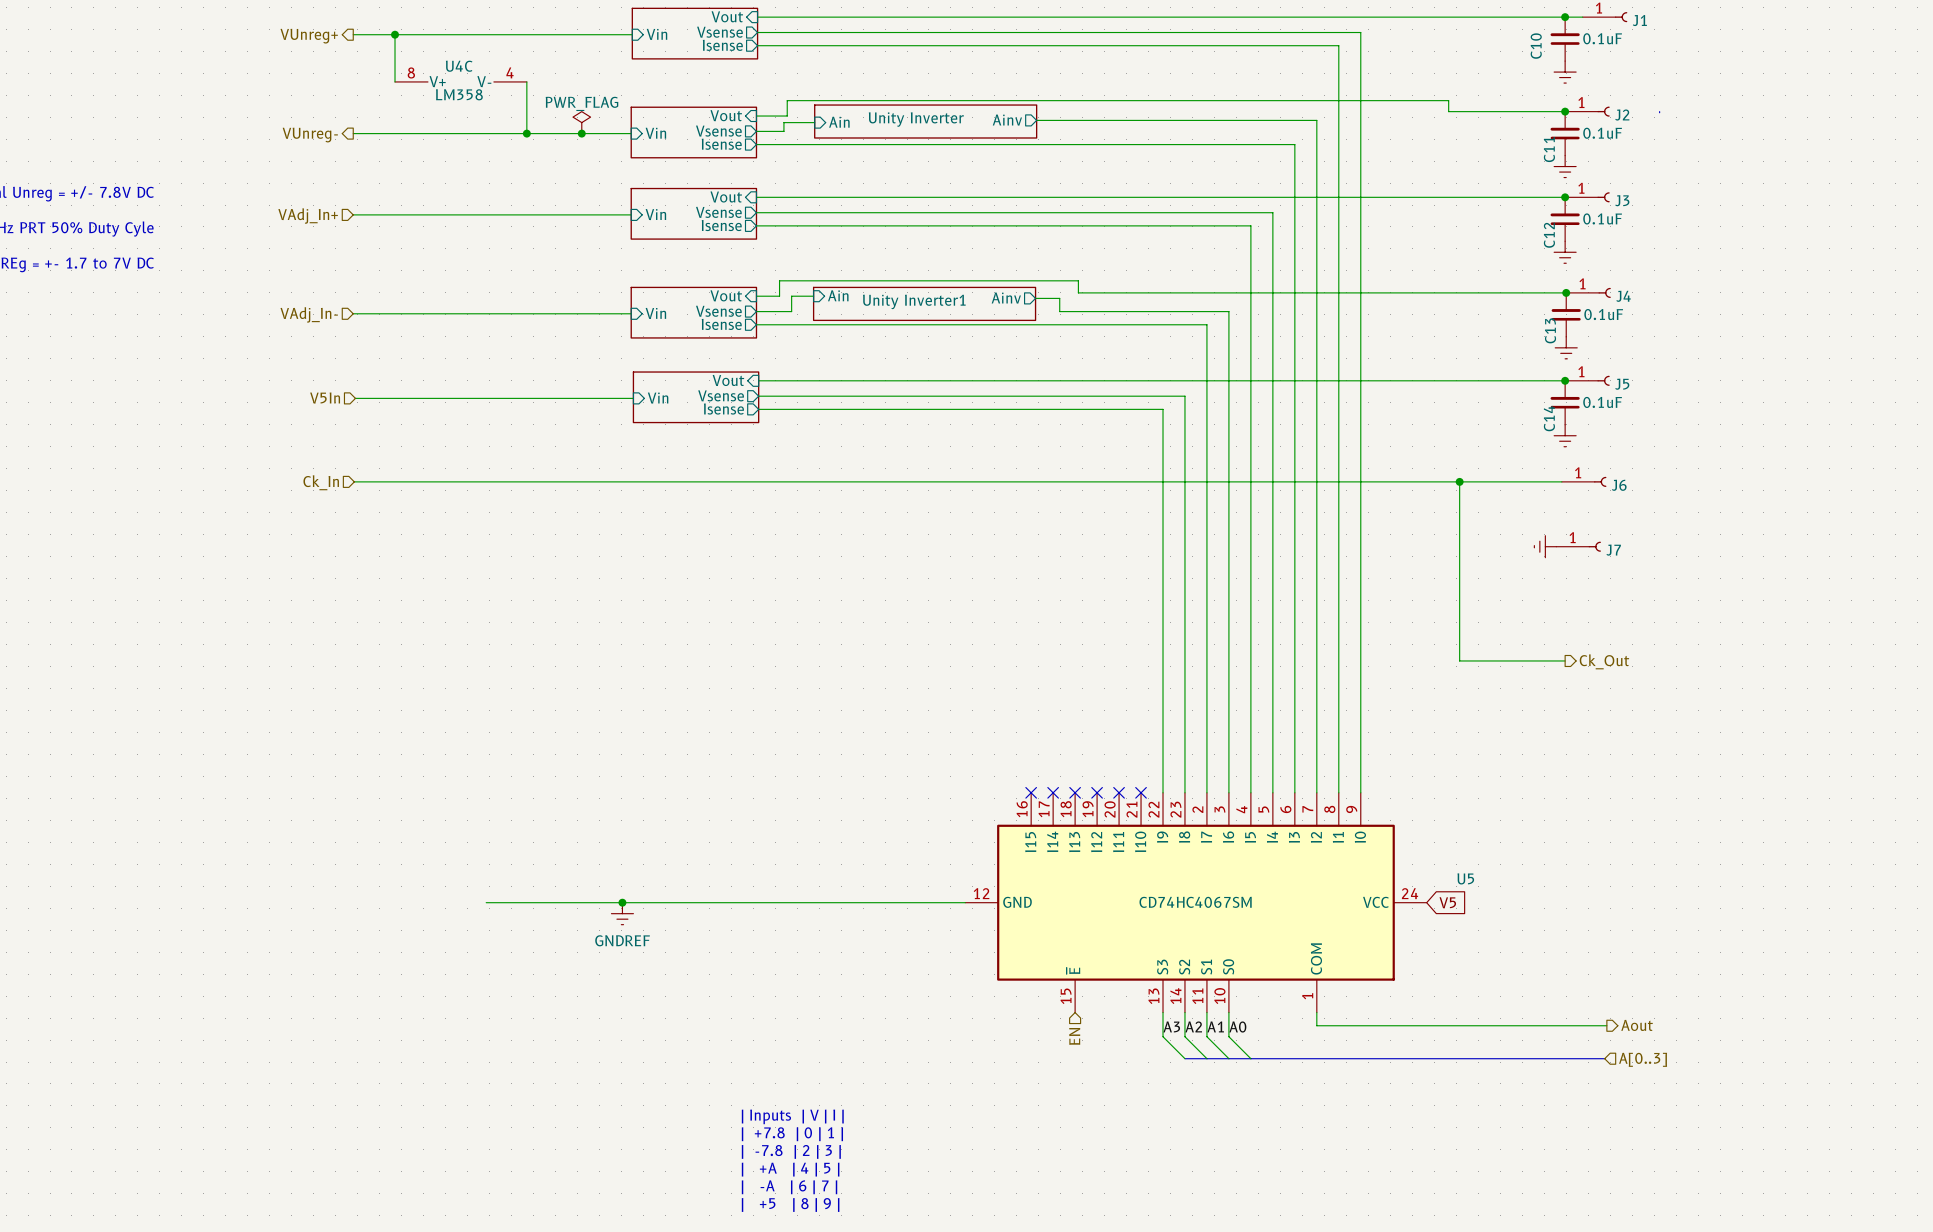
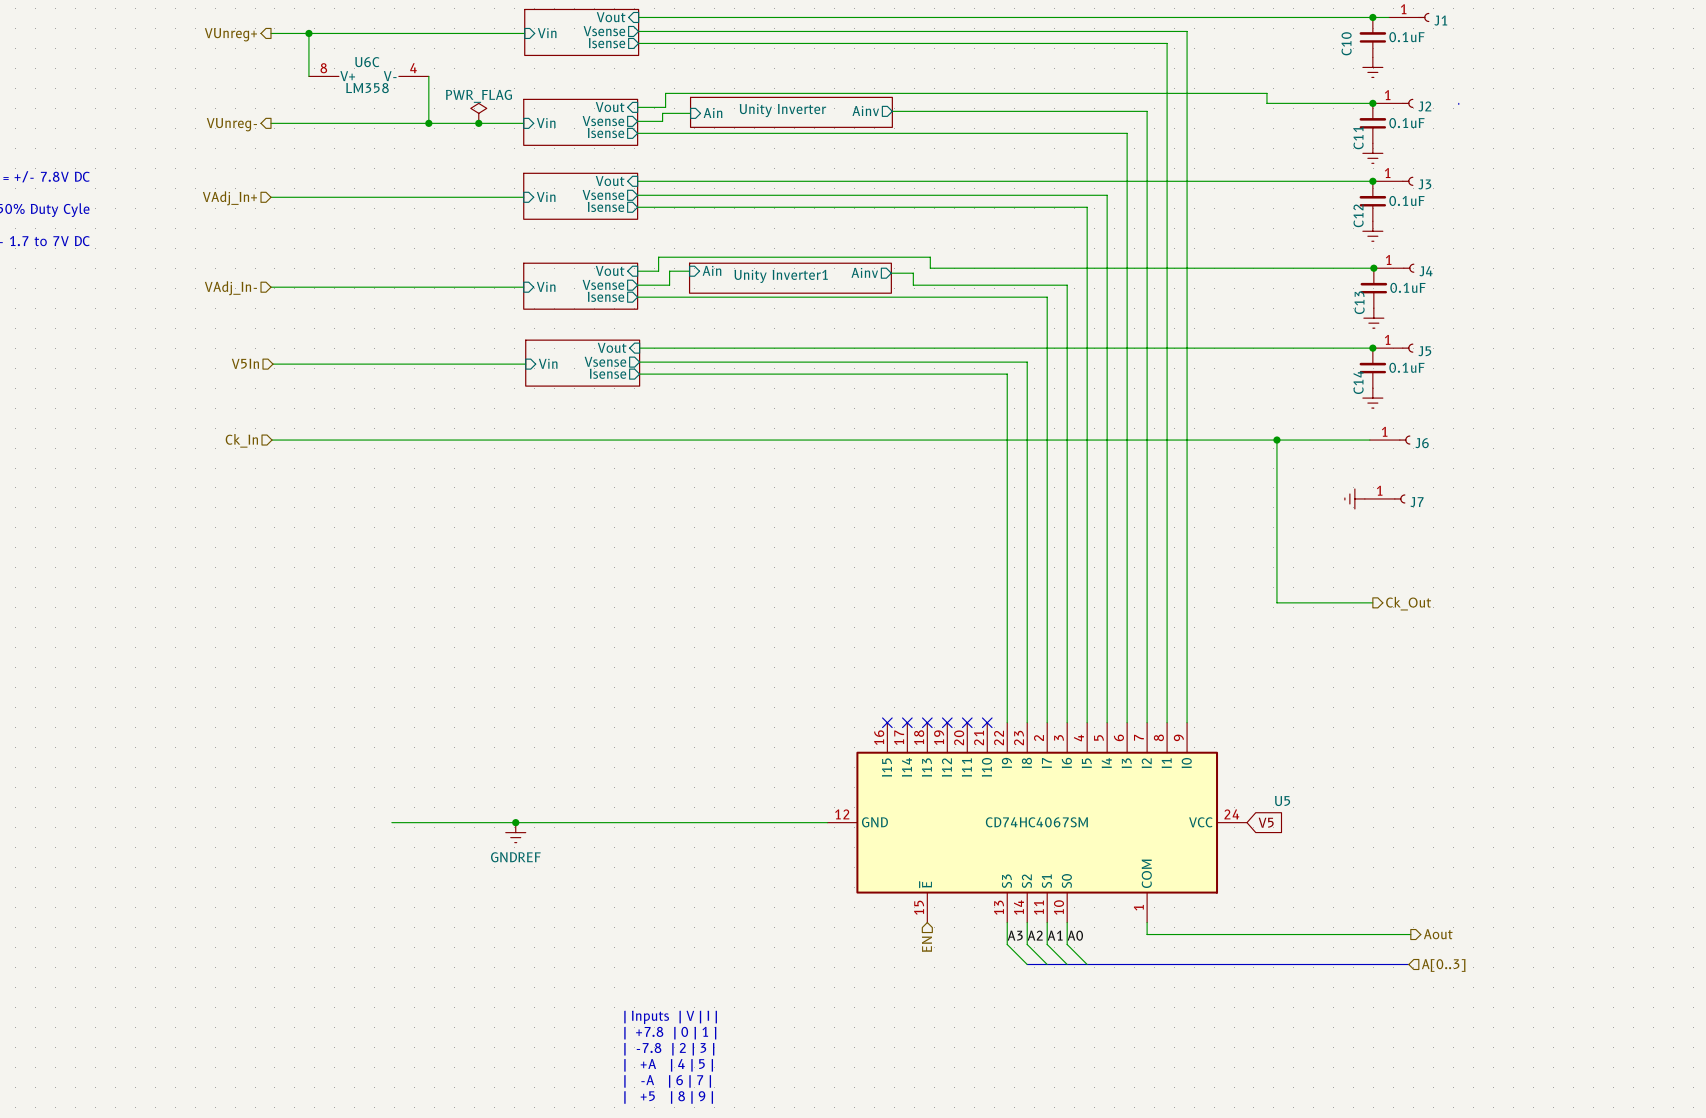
U4C name: U4C (459, 66) -> U6C (367, 62)

